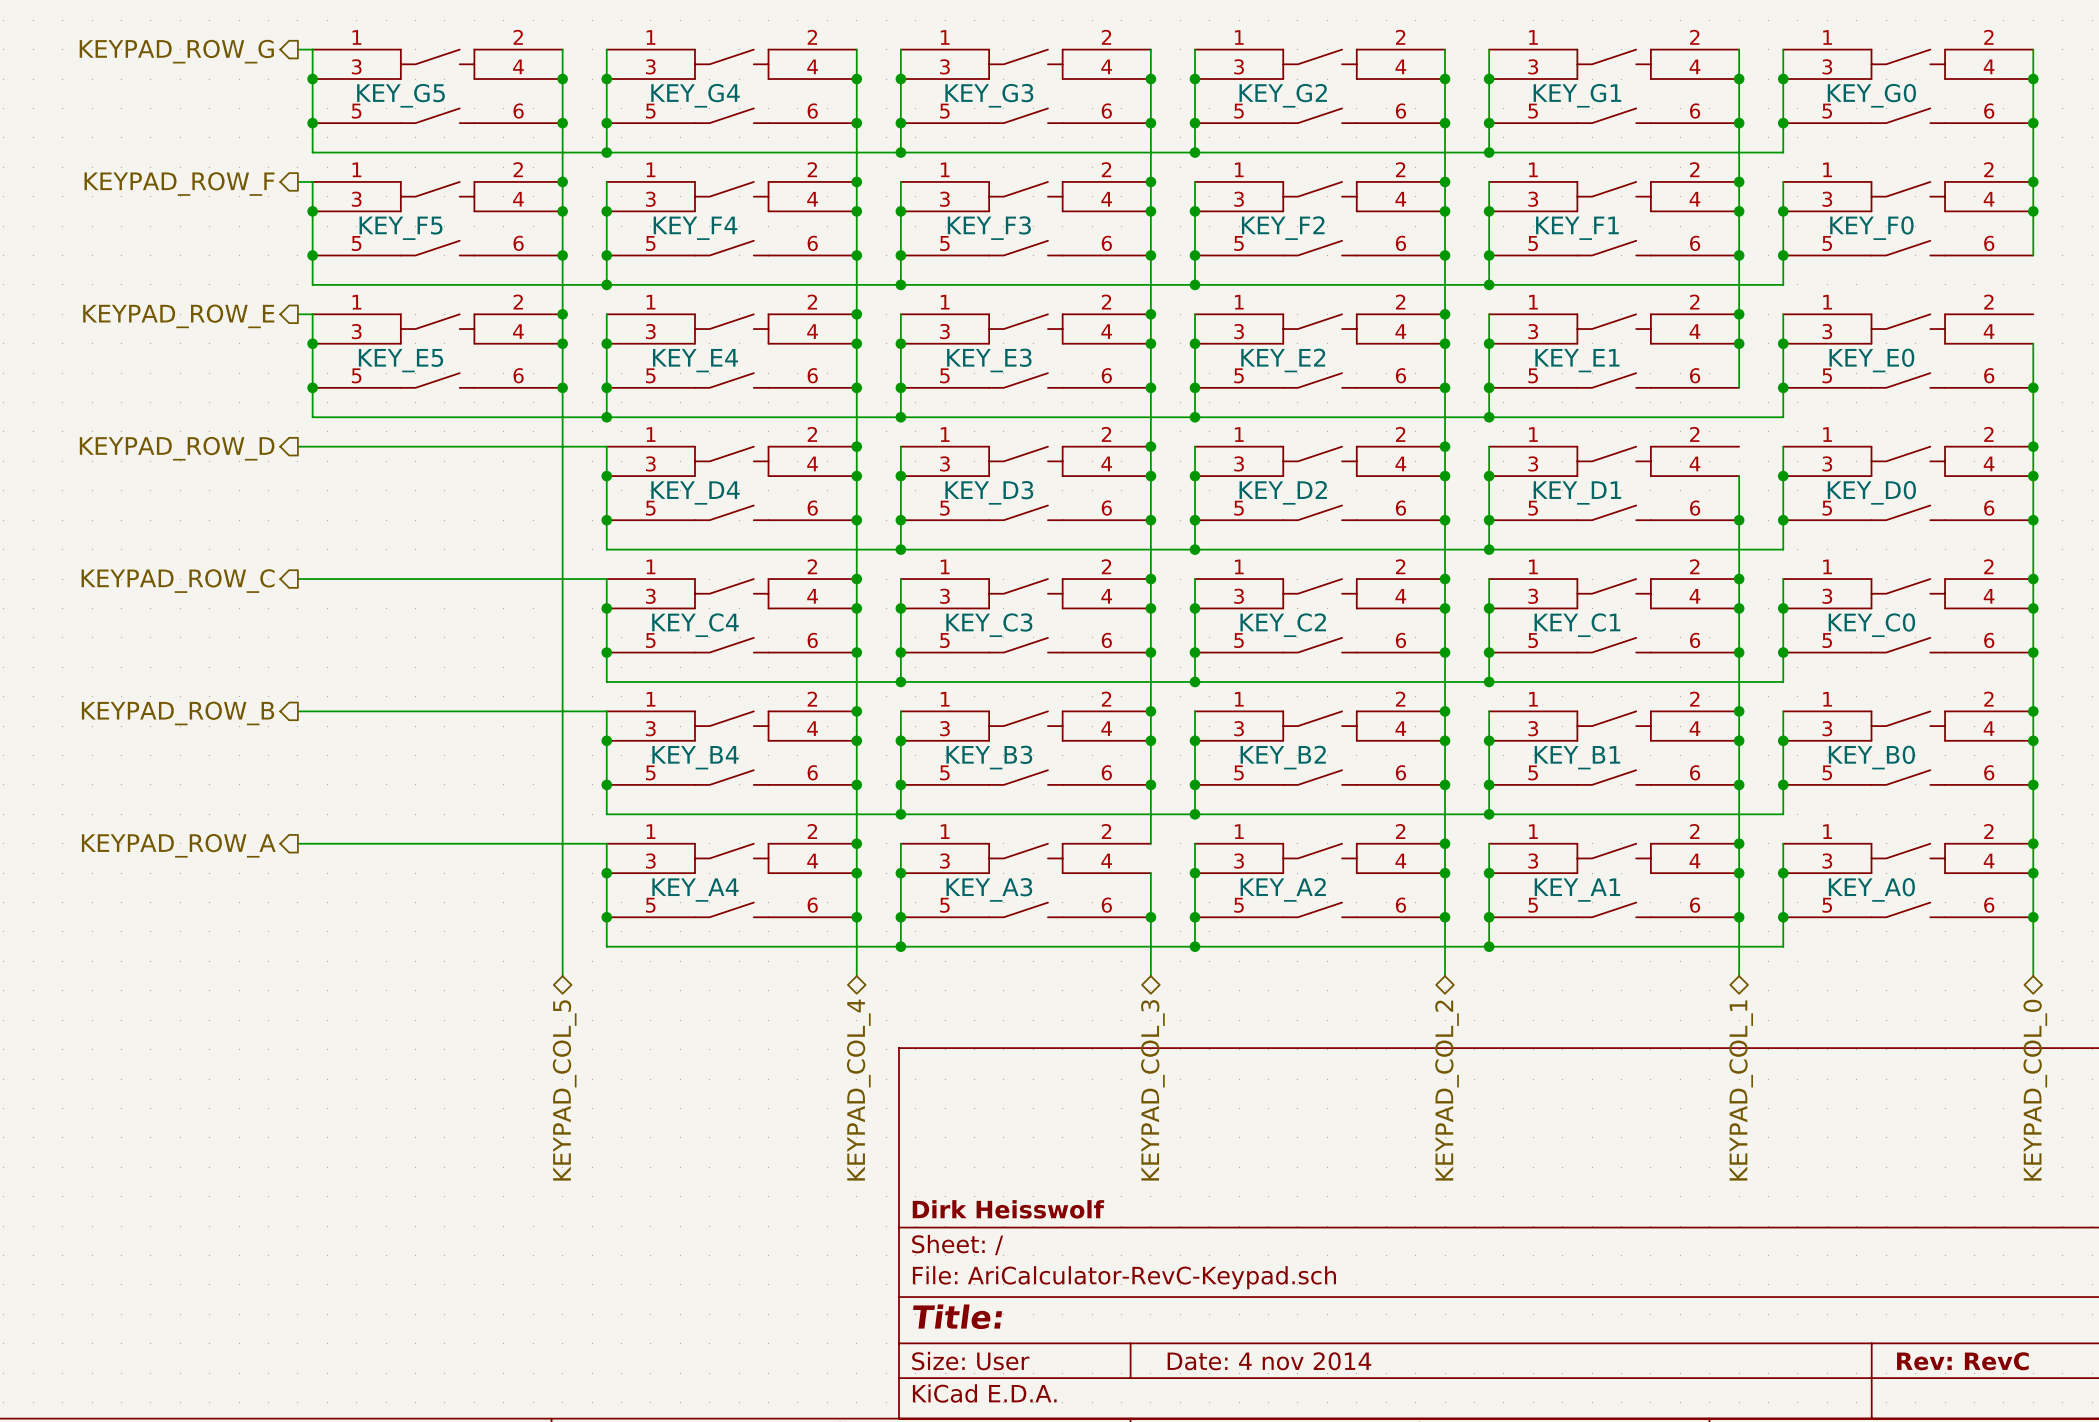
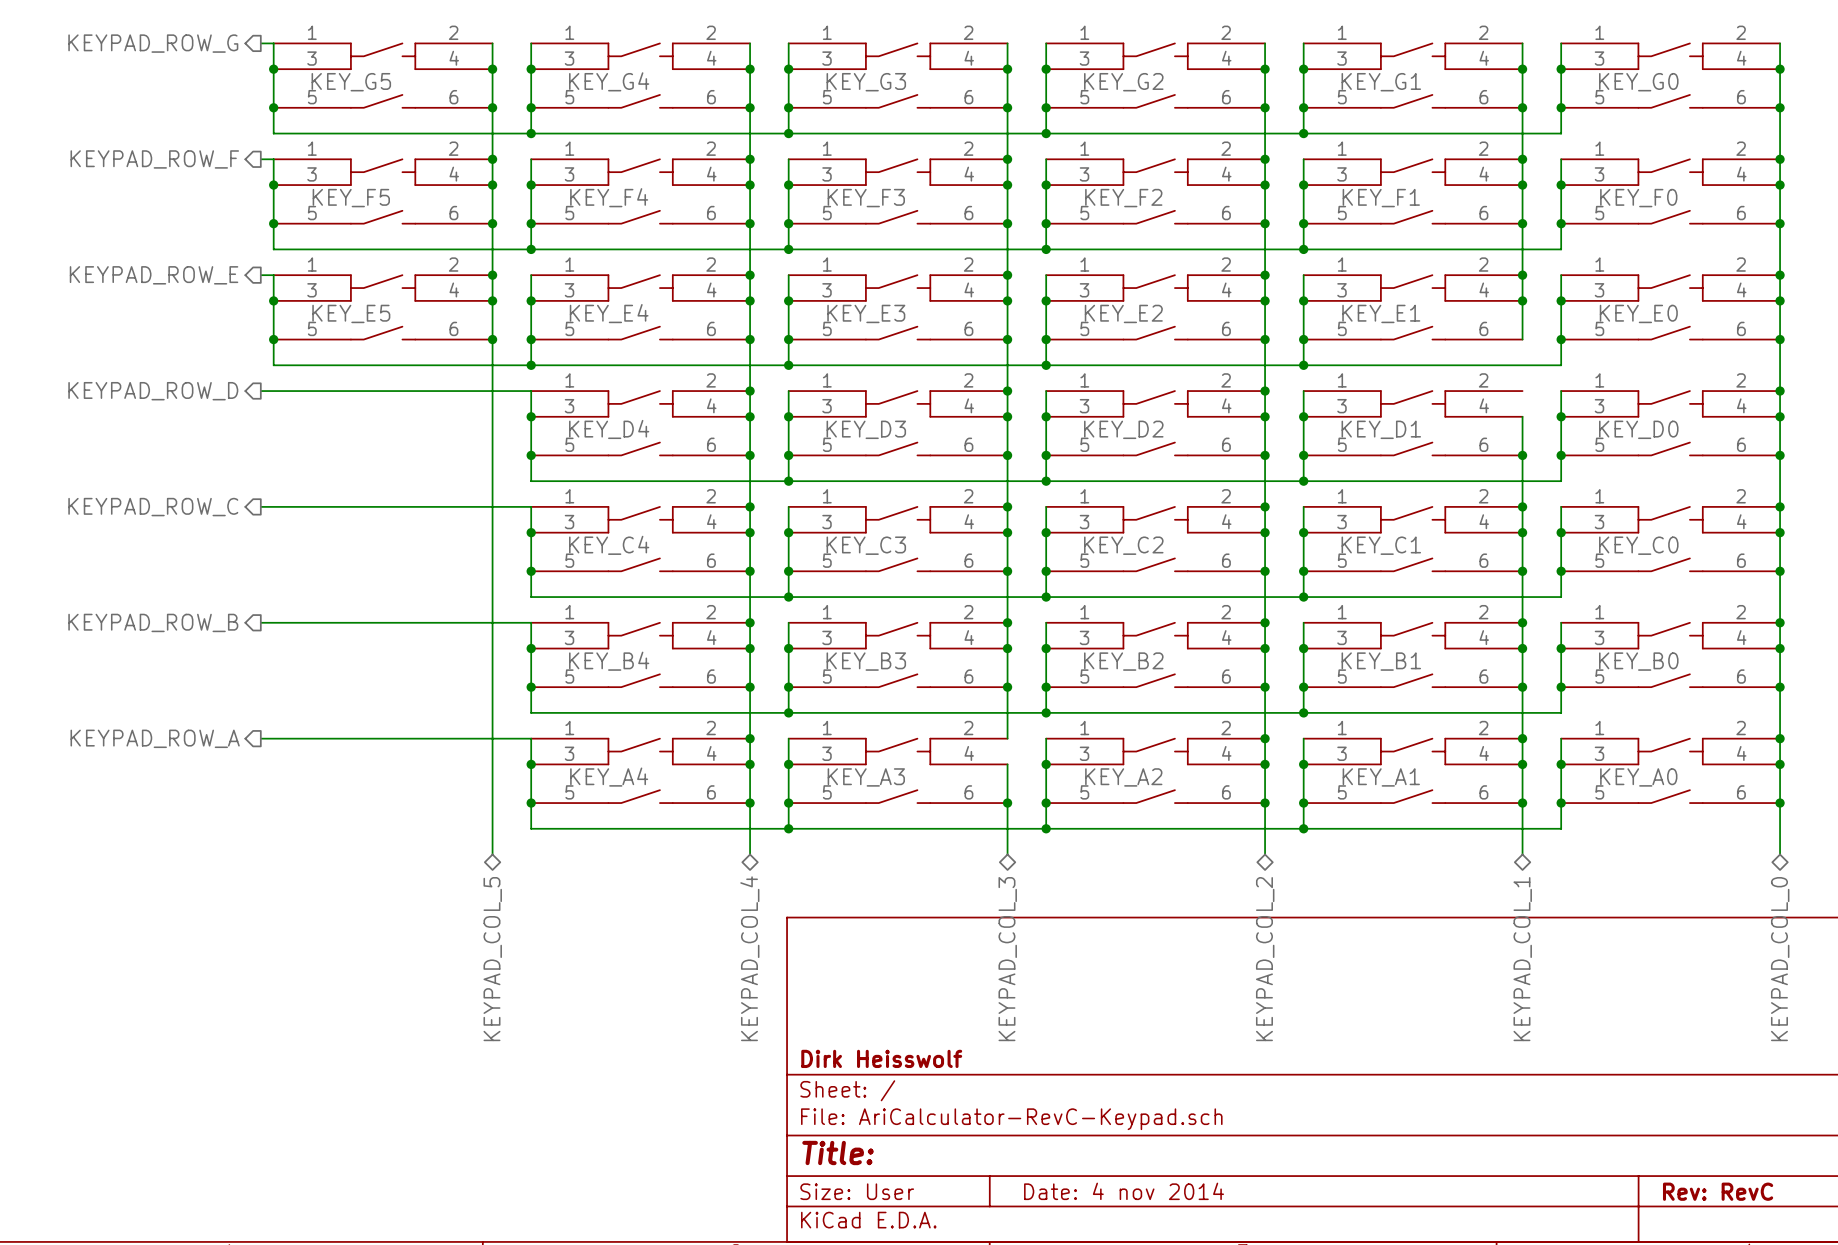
wire: none -> (1780, 223) (1780, 300)
junction: none -> (1780, 223)
junction: none -> (1780, 275)
junction: none -> (1780, 300)

